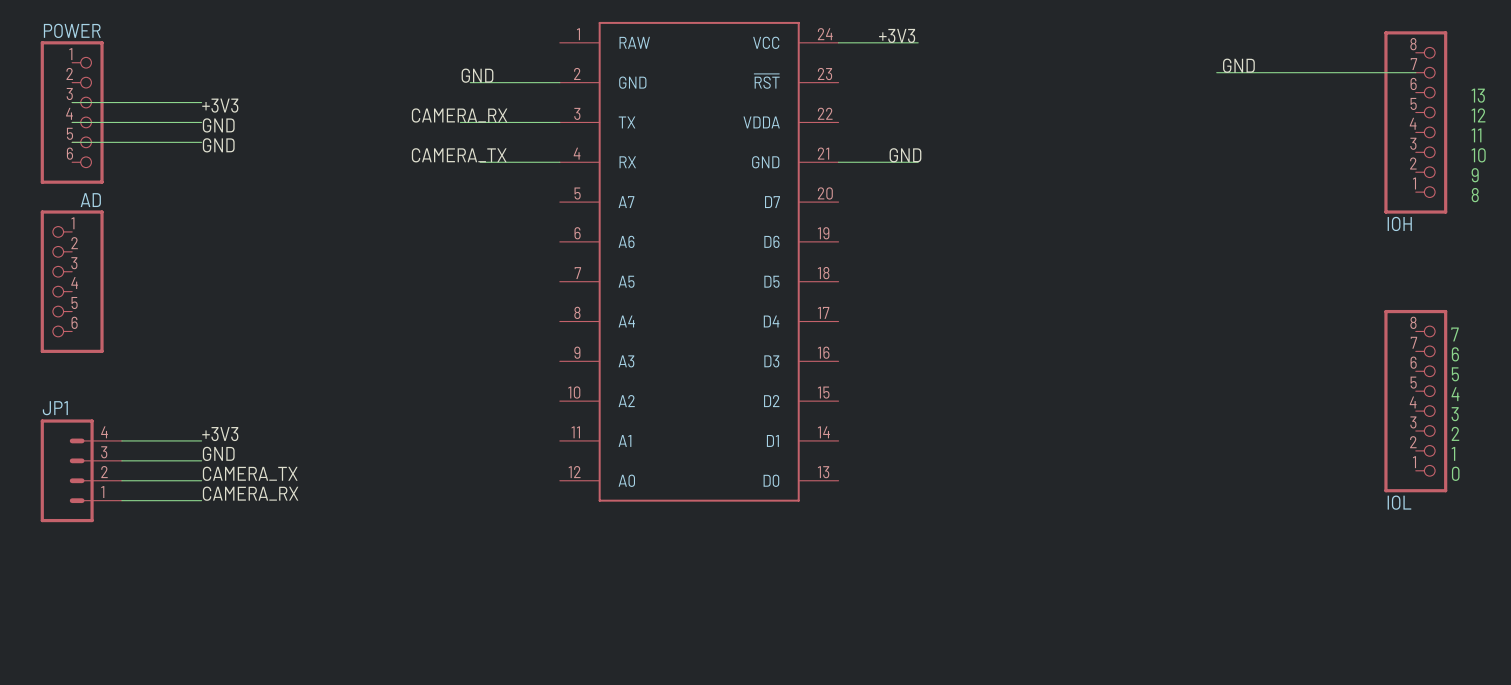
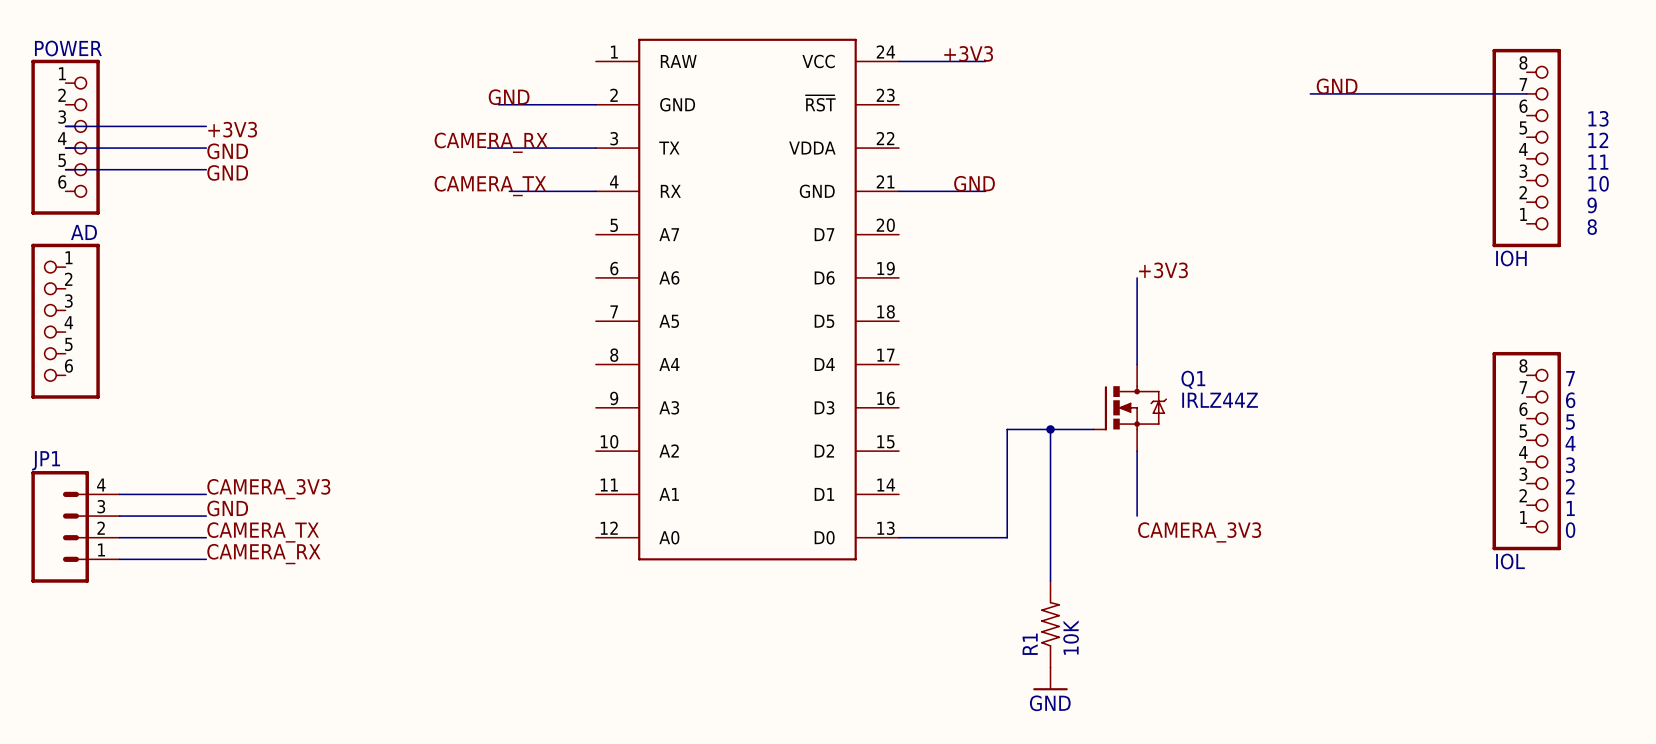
label: none -> +3V3 (1163, 270)
wire: none -> (1137, 277) (1137, 364)
Q1: none -> IRLZ44Z (1130, 407)
wire: none -> (1050, 429) (1050, 580)
junction: none -> (1050, 429)
wire: none -> (1093, 429) (1007, 429) (1007, 537) (898, 537)
wire: none -> (1137, 451) (1137, 516)
label: +3V3 (220, 434) -> CAMERA_3V3 (268, 489)
label: none -> CAMERA_3V3 (1199, 532)
R1: none -> 10K (1050, 624)
power symbol: none -> GND (1050, 678)

